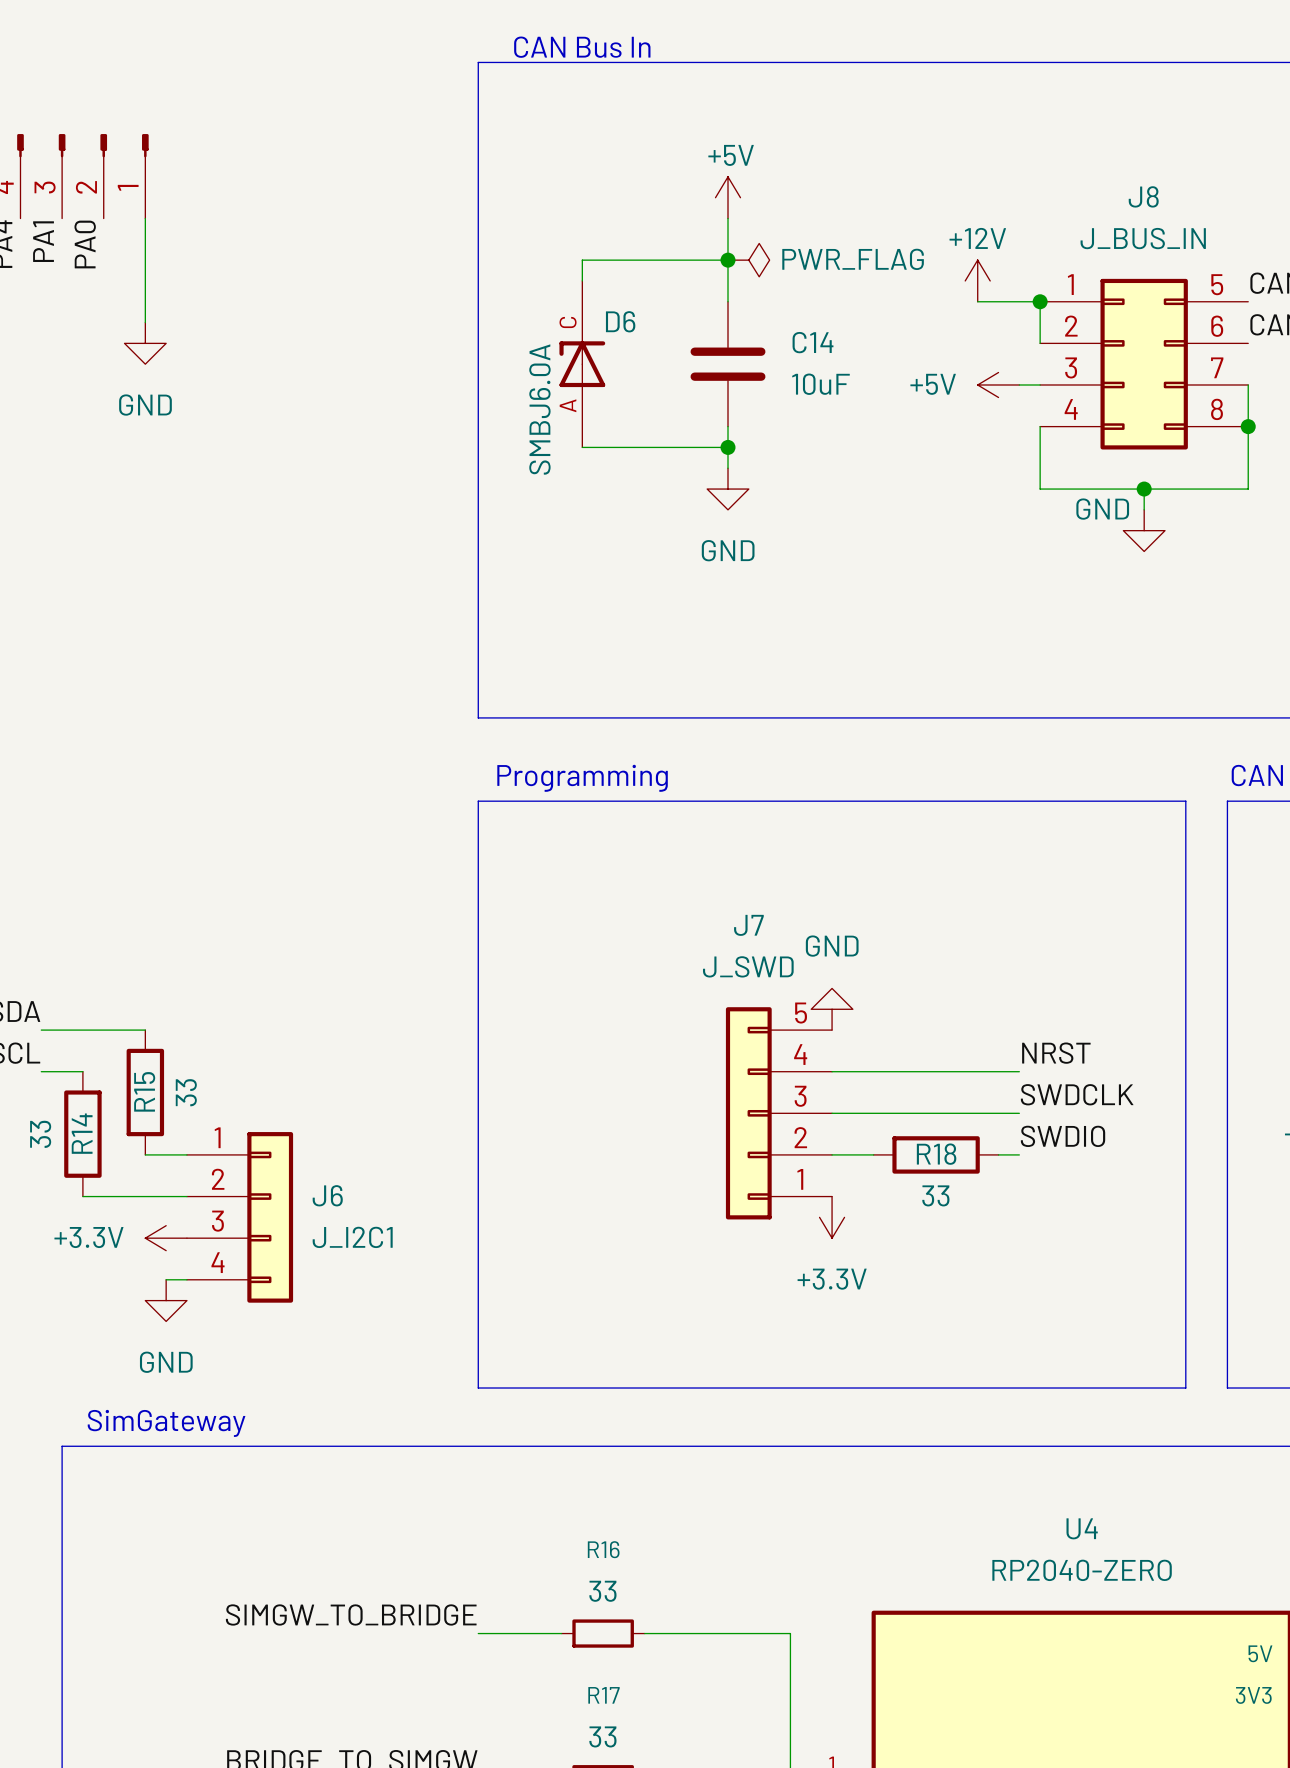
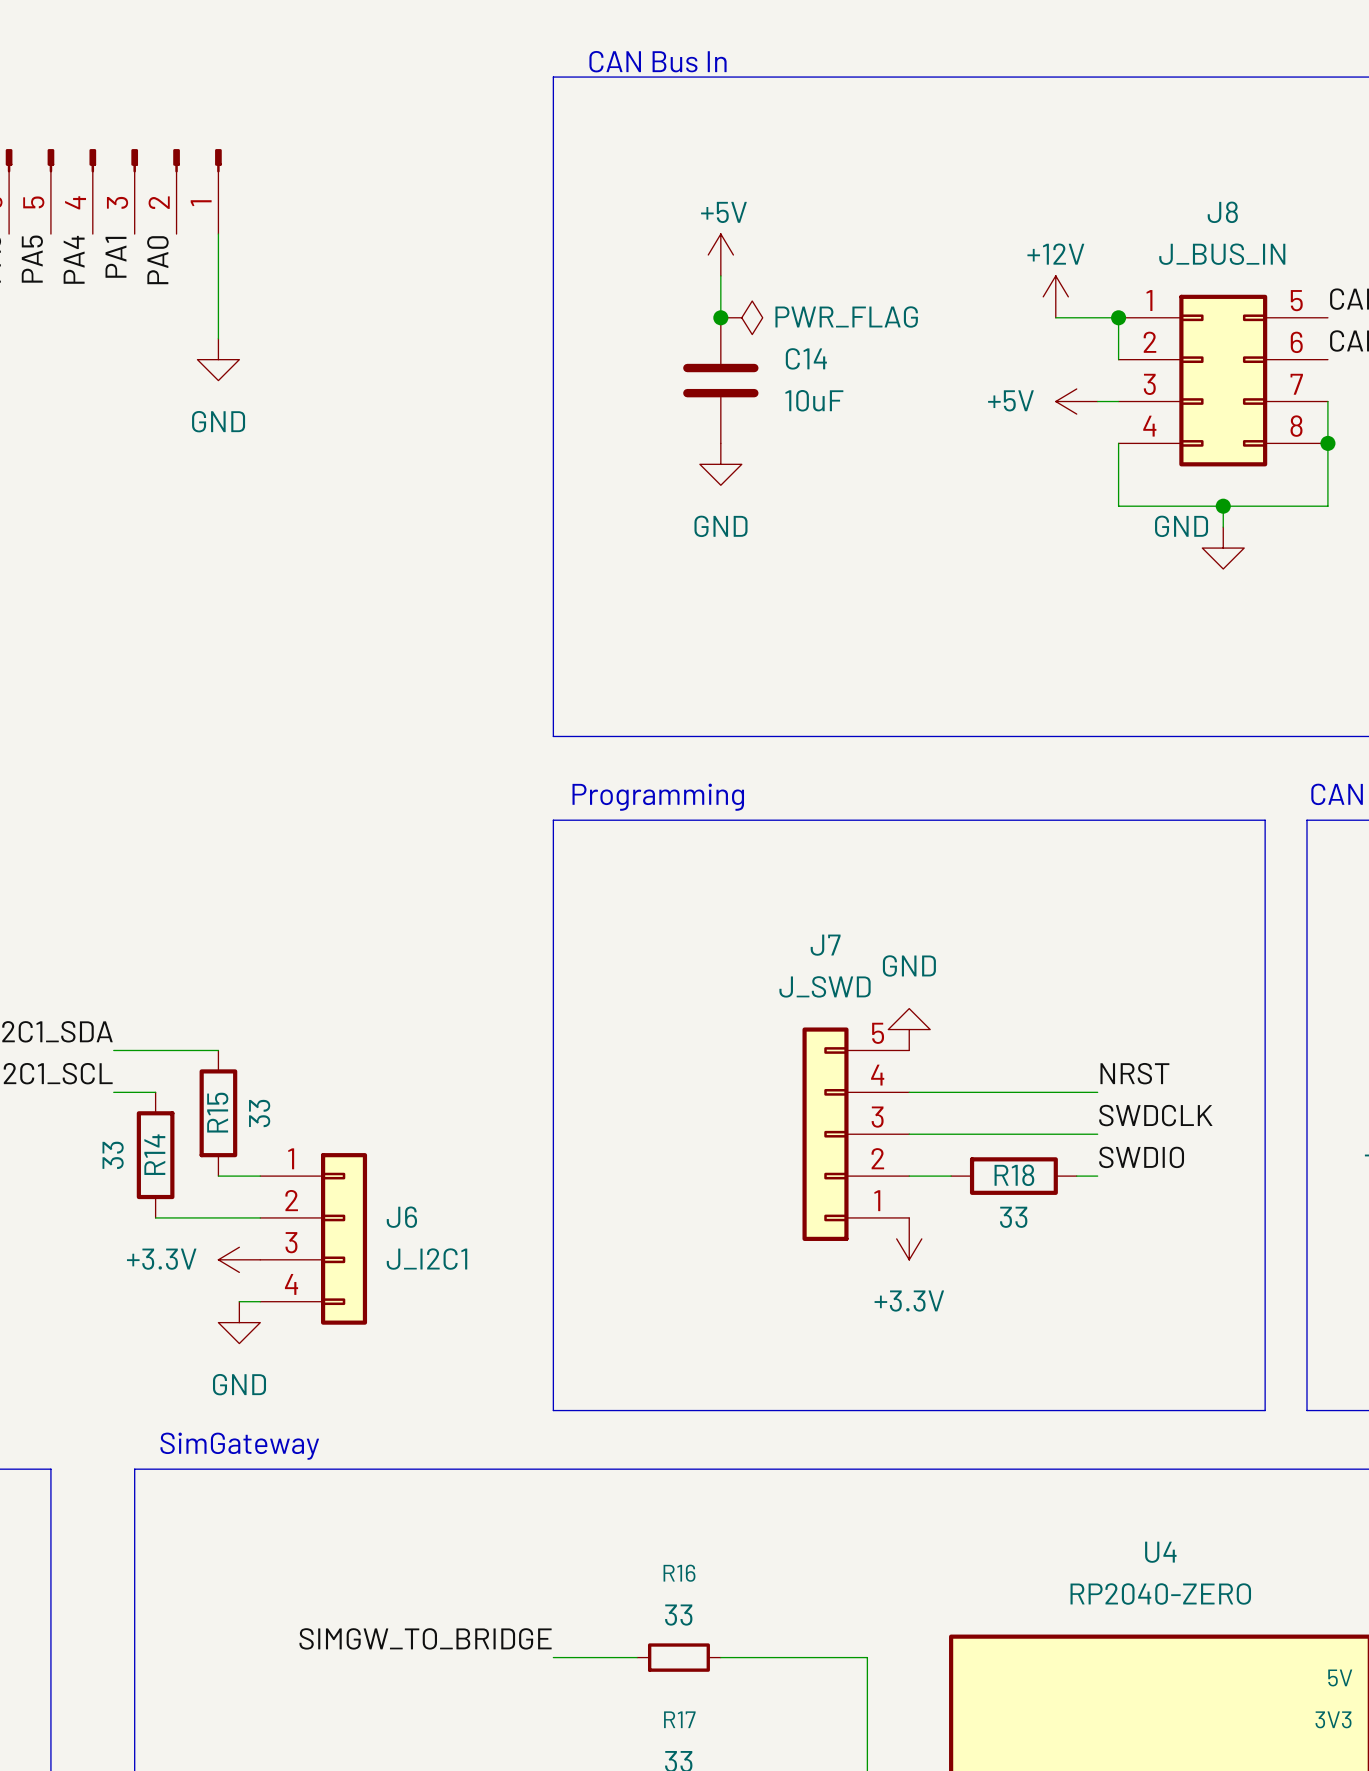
power symbol position: +5V (728, 197) -> +5V (720, 254)
wire: (728, 218) (728, 301) -> none
wire: (728, 260) (582, 260) (582, 280) -> none
junction: (728, 260) -> none
power symbol position: PWR_FLAG (748, 260) -> PWR_FLAG (741, 317)
junction: none -> (720, 317)
D6: SMBJ6.0A (582, 364) -> none
C14 position: (728, 364) -> (720, 380)
wire: (728, 426) (728, 468) -> (720, 275) (720, 317)
wire: (582, 447) (728, 447) -> none
junction: (728, 447) -> none
power symbol position: GND (728, 489) -> GND (720, 464)

